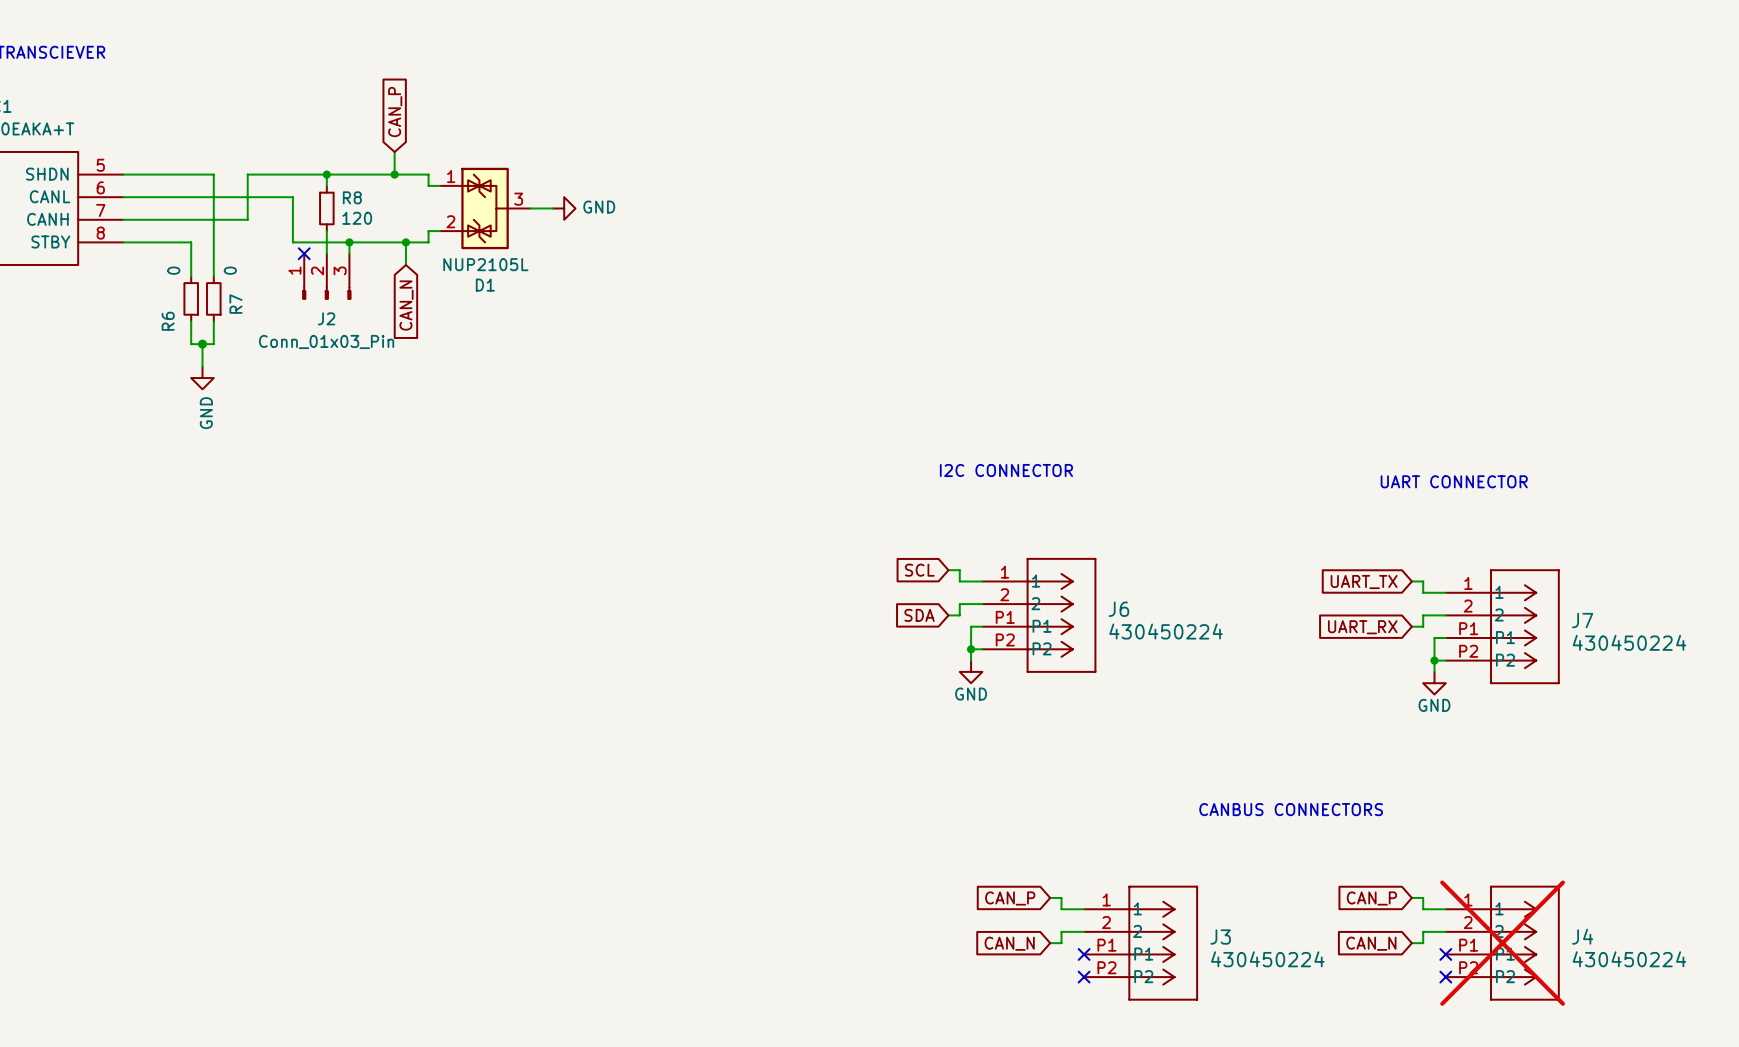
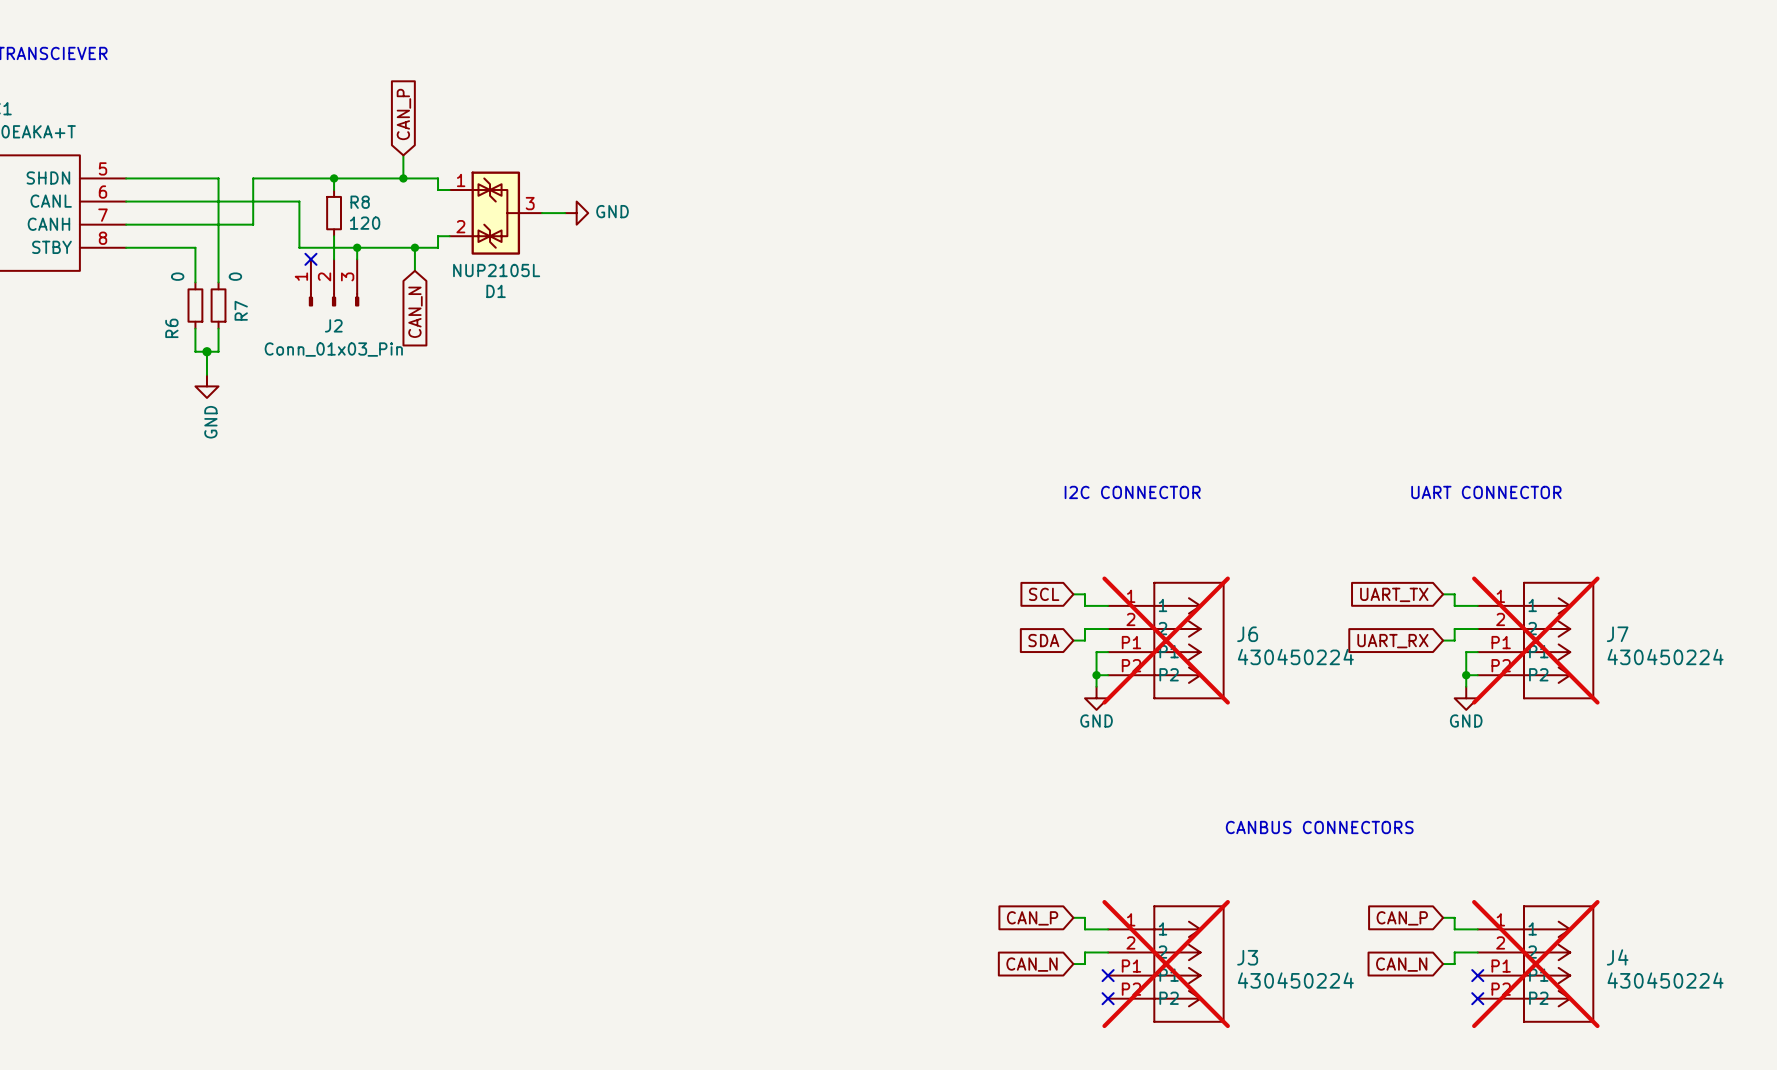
text position: I2C CONNECTOR (1006, 470) -> I2C CONNECTOR (1132, 492)
global label position: SCL (919, 570) -> SCL (1044, 594)
wire: (948, 570) (959, 570) (959, 581) (982, 581) -> (1073, 594) (1084, 594) (1084, 605) (1108, 605)
wire: (982, 604) (959, 604) (959, 615) (948, 615) -> (1108, 629) (1084, 629) (1084, 640) (1073, 640)
global label position: SDA (919, 615) -> SDA (1043, 640)
J6 position: (1039, 615) -> (1166, 640)
wire: (982, 626) (971, 626) (971, 660) -> (1108, 652) (1096, 652) (1096, 686)
J6 do-not-place cross: none -> (1166, 640)
J7 do-not-place cross: none -> (1535, 640)
wire: (971, 649) (982, 649) -> (1096, 675) (1108, 675)
junction: (971, 649) -> none
junction: none -> (1096, 675)
power symbol position: GND (971, 671) -> GND (1096, 698)
J3 do-not-place cross: none -> (1166, 964)

